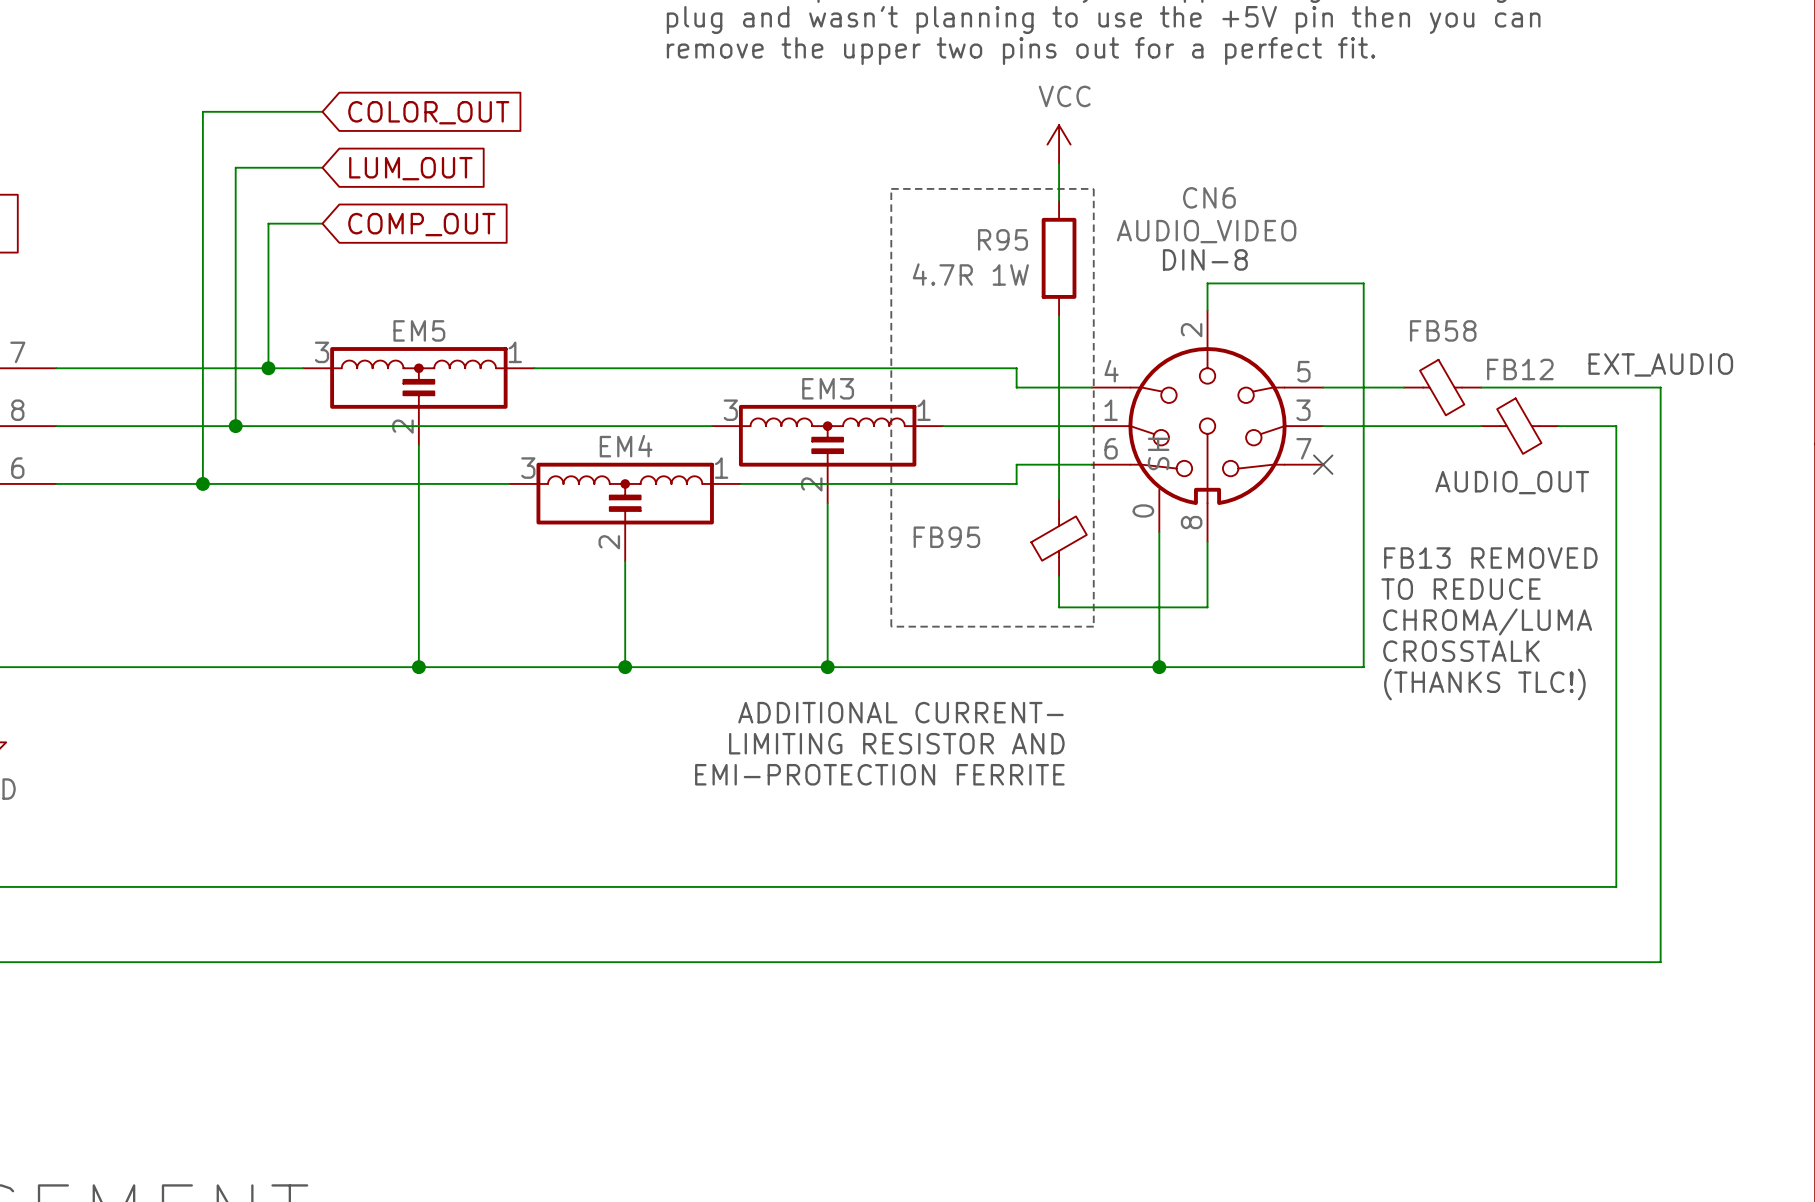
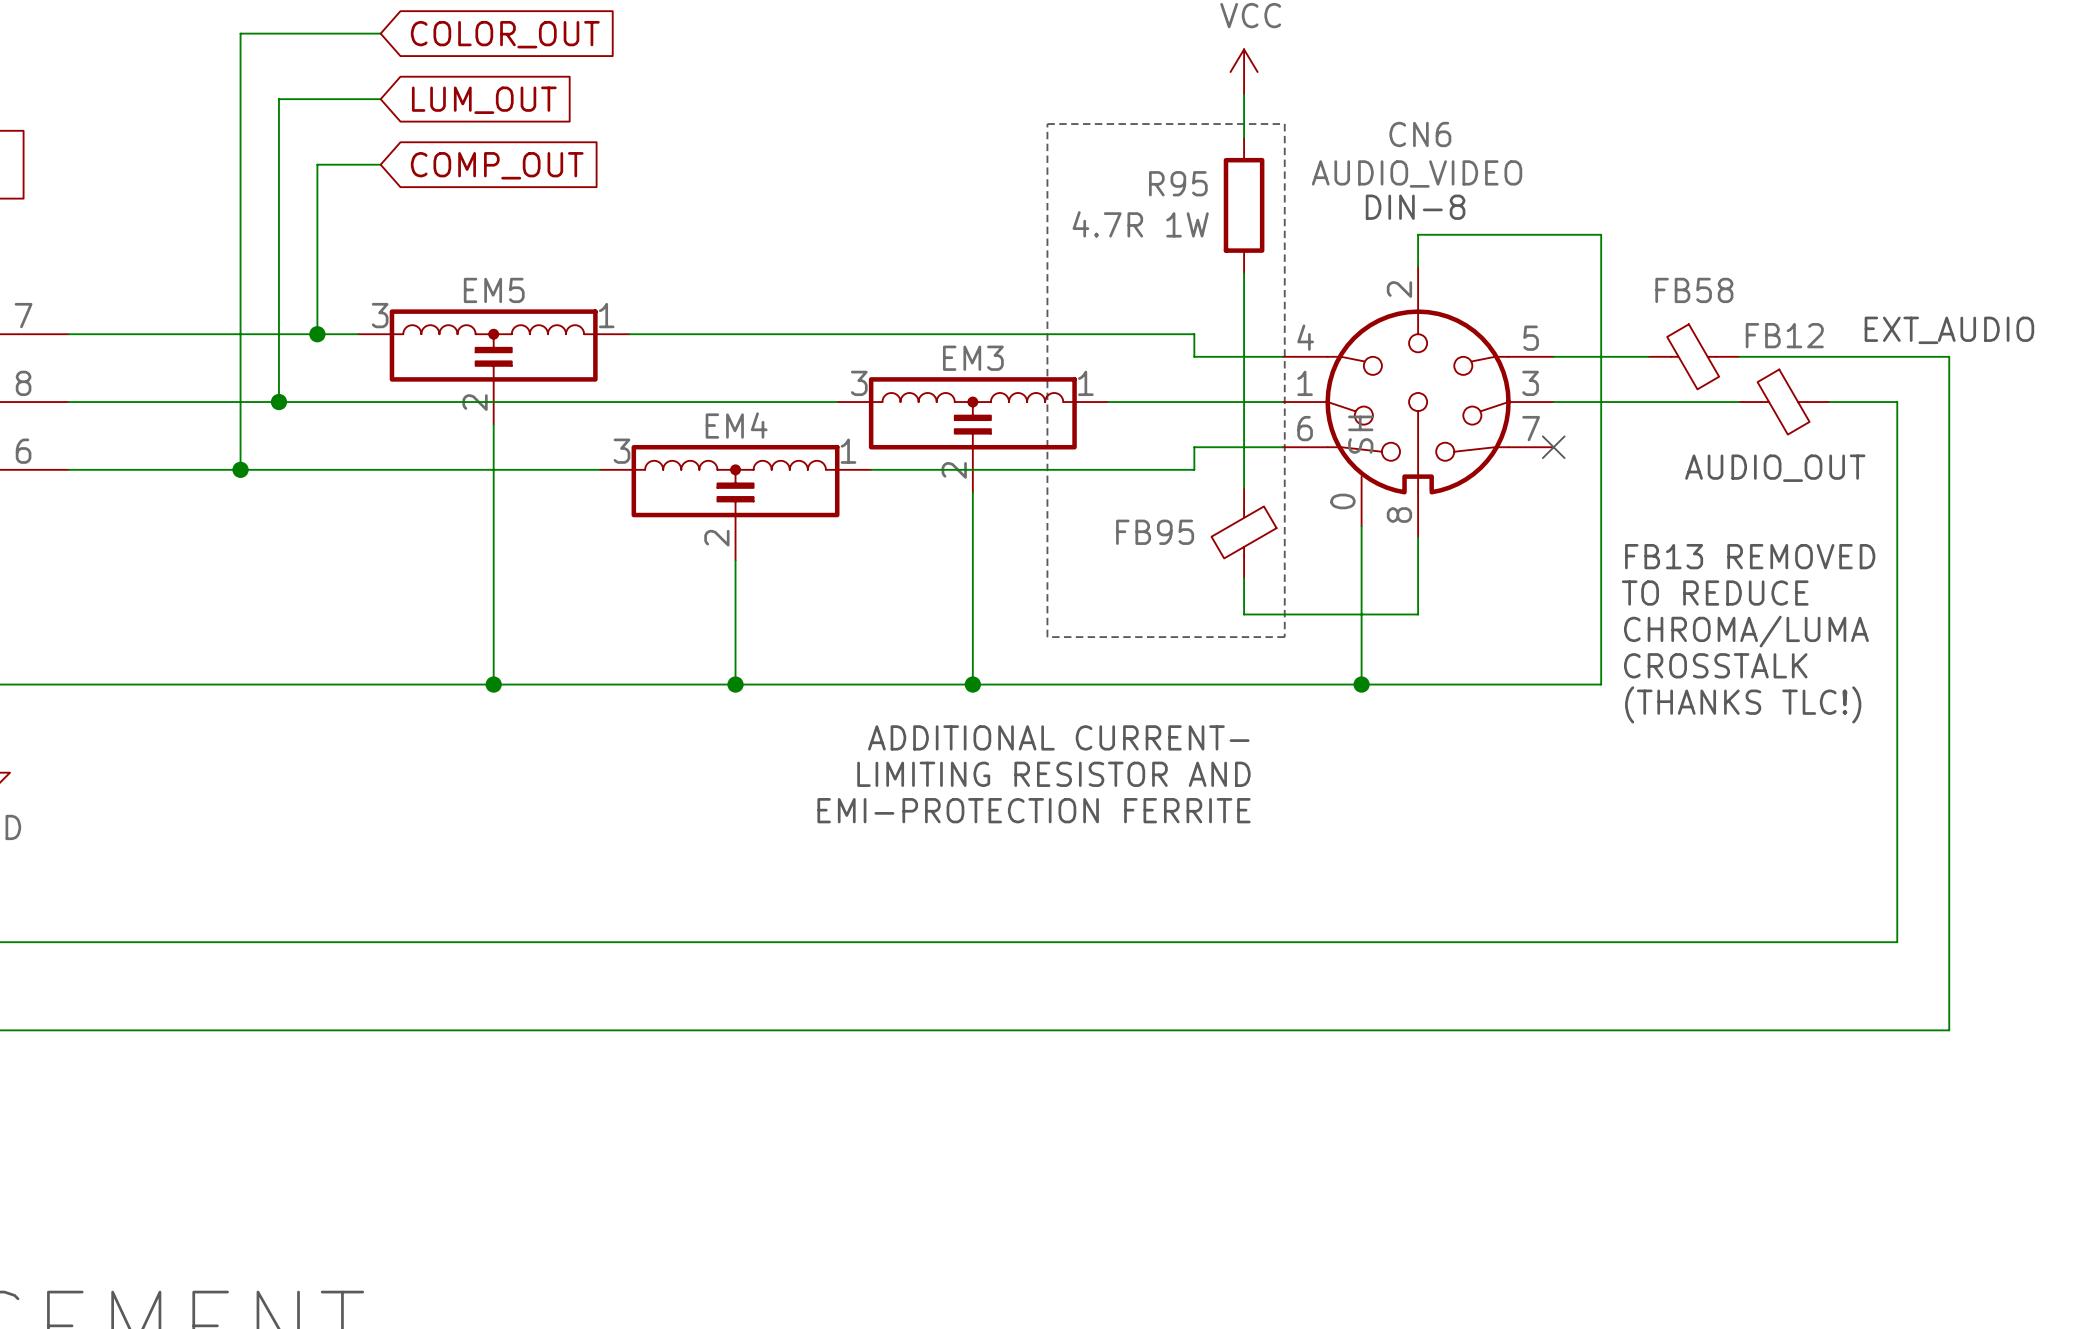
FB95 name position: FB95 (946, 537) -> FB95 (1155, 532)
FB95 rotation: 0° (1059, 538) -> 180° (1244, 532)

